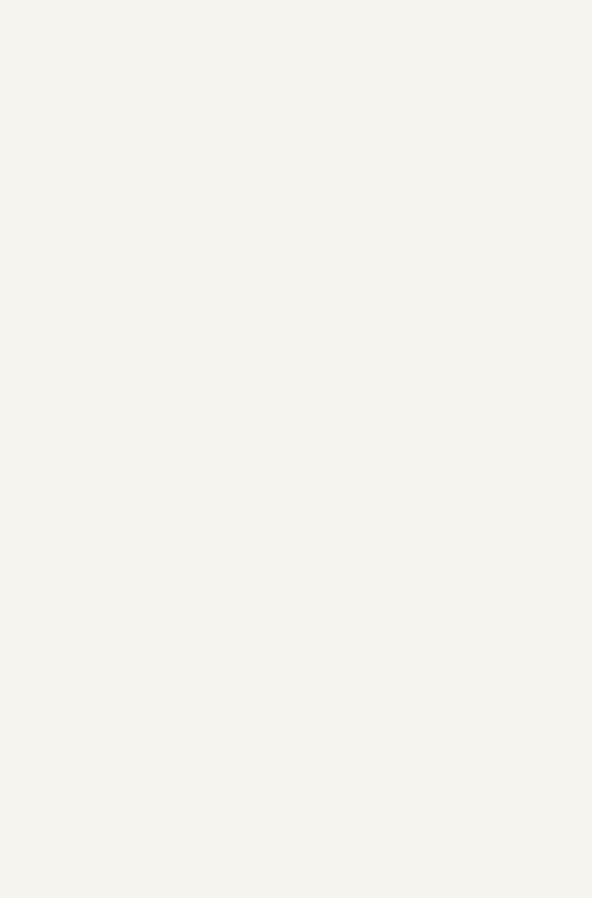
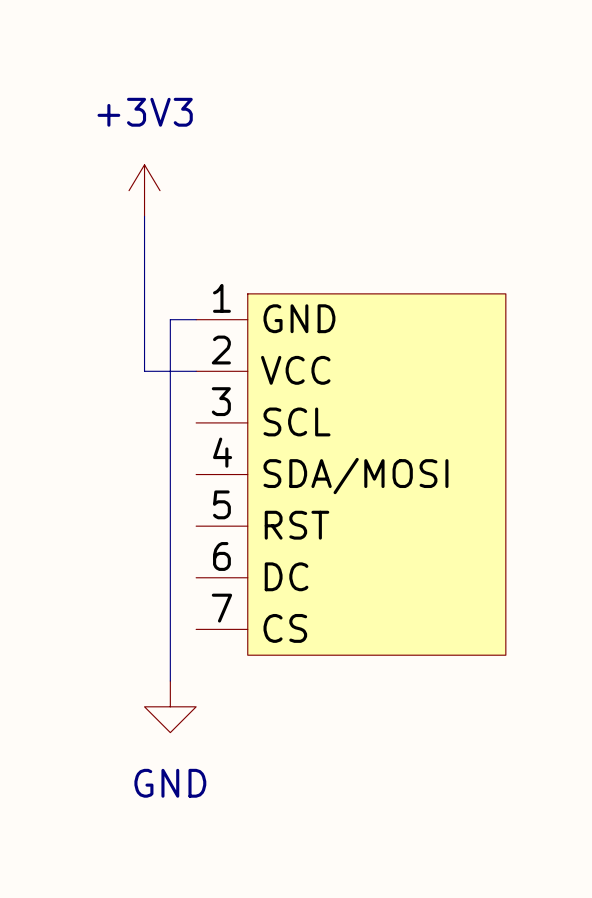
power symbol: none -> +3V3 (144, 190)
wire: none -> (144, 216) (144, 371) (196, 371)
wire: none -> (196, 319) (170, 319) (170, 681)
part: none -> (350, 474)
power symbol: none -> GND (170, 706)

